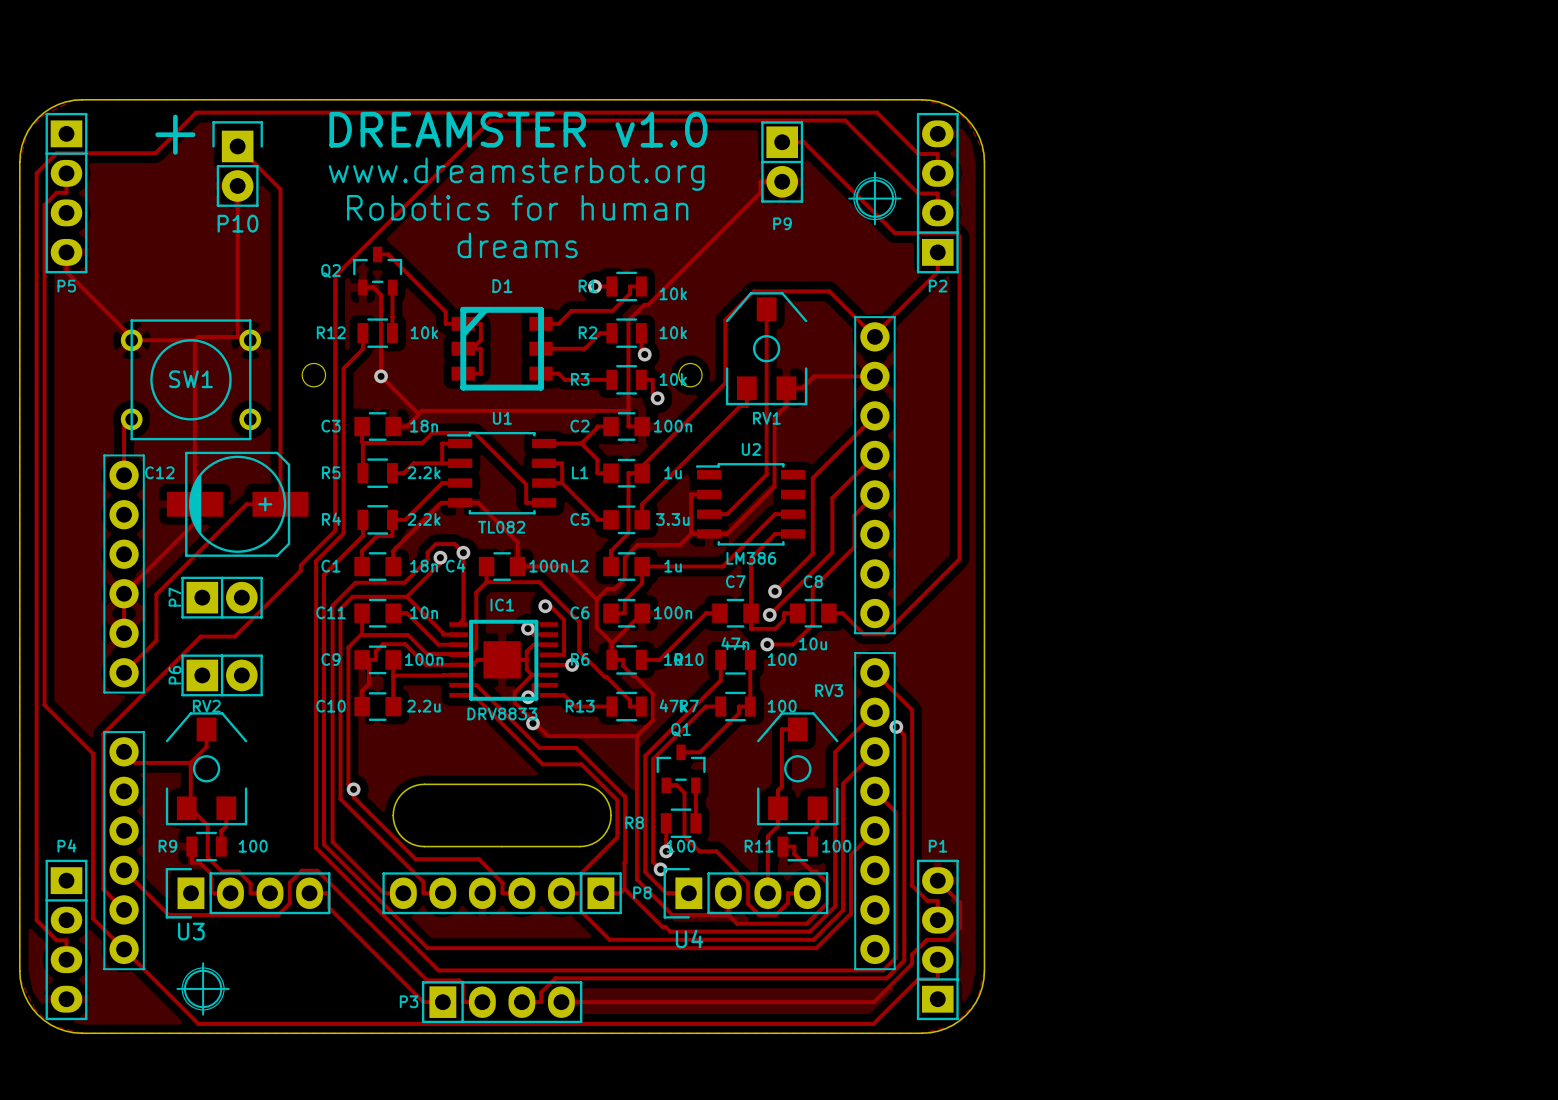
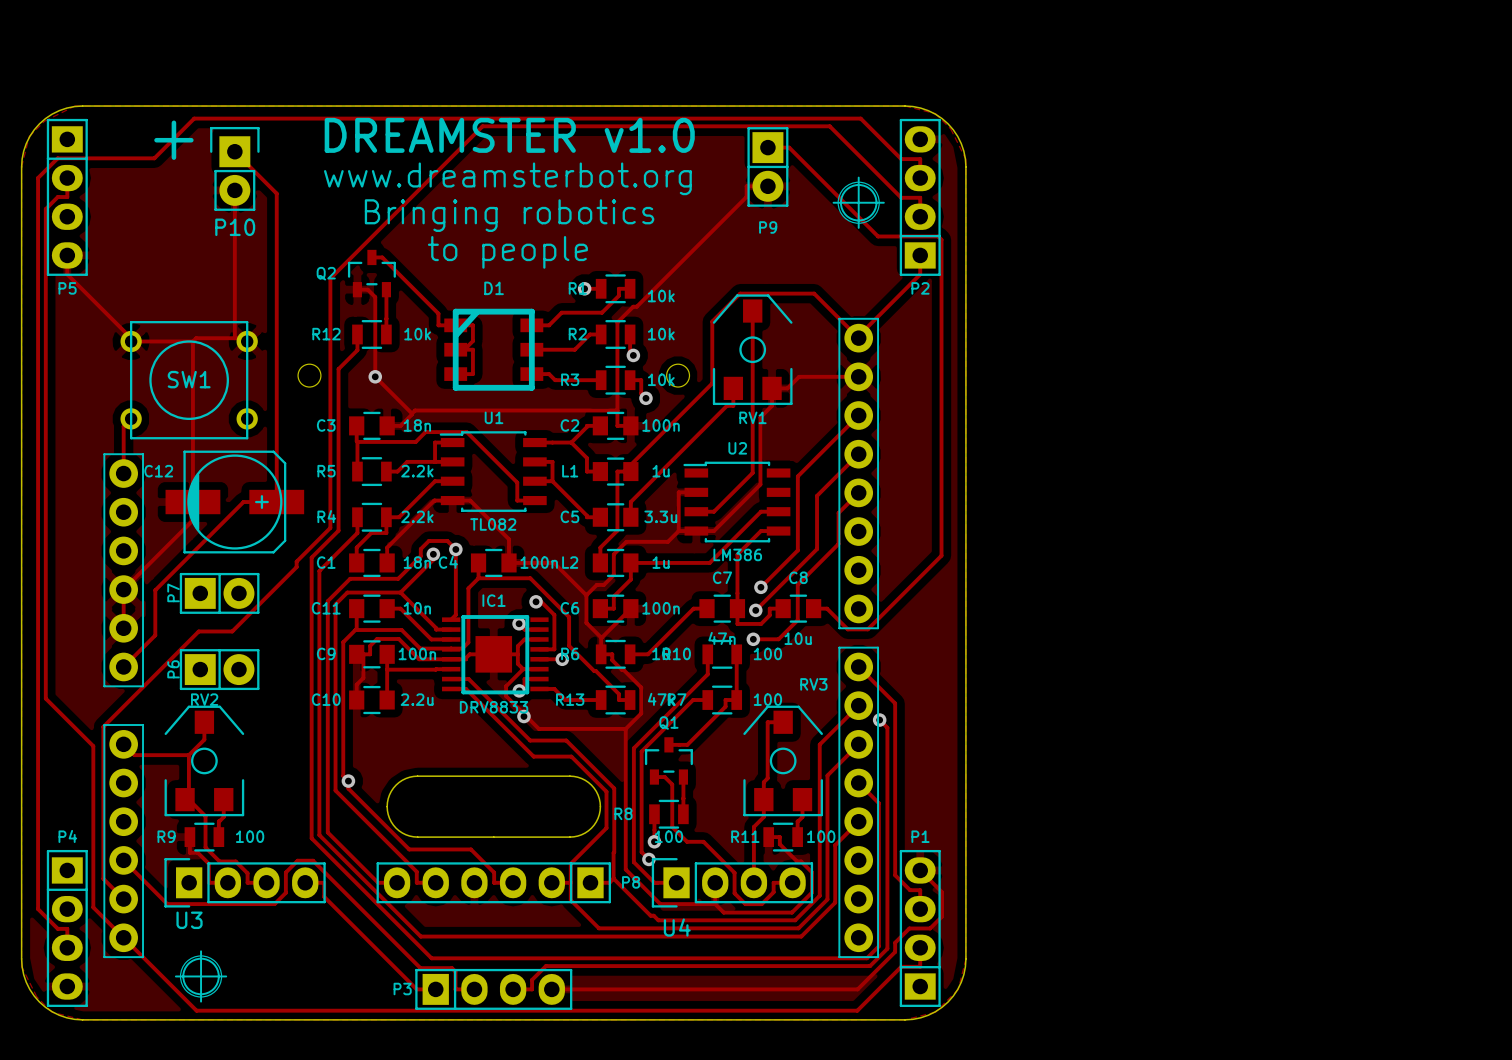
text: Robotics for human (517, 207) -> Bringing robotics (509, 215)
text: dreams (517, 245) -> to people (507, 252)

